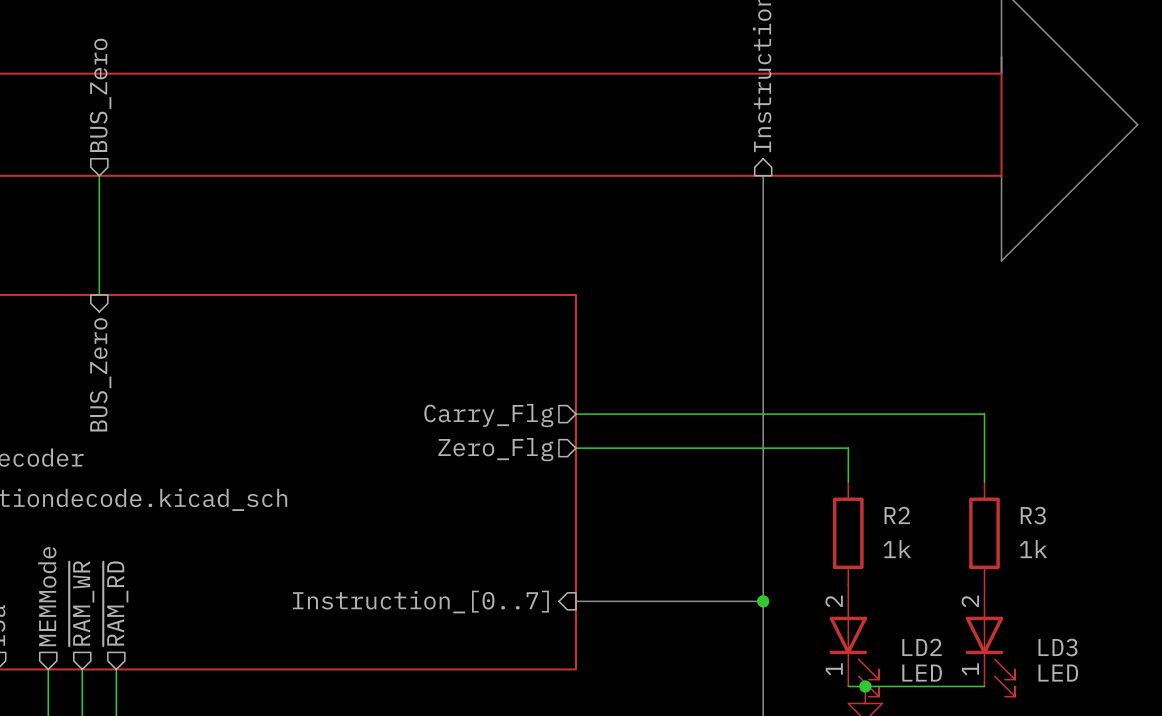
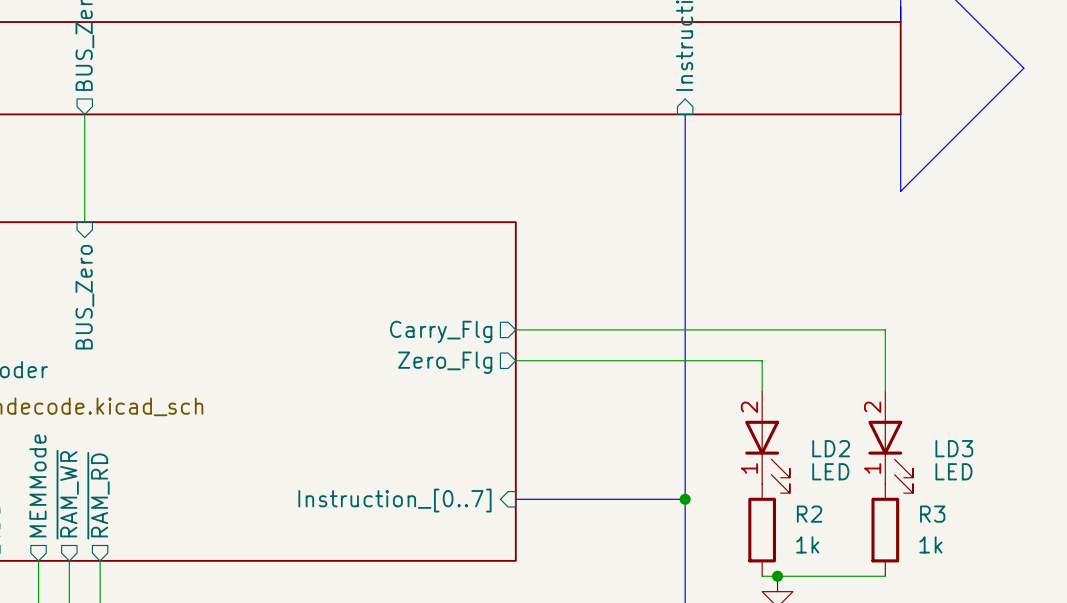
R2 position: (848, 533) -> (762, 530)
R3 position: (984, 533) -> (885, 530)
LD2 position: (854, 640) -> (767, 442)
LD3 position: (990, 640) -> (890, 442)

